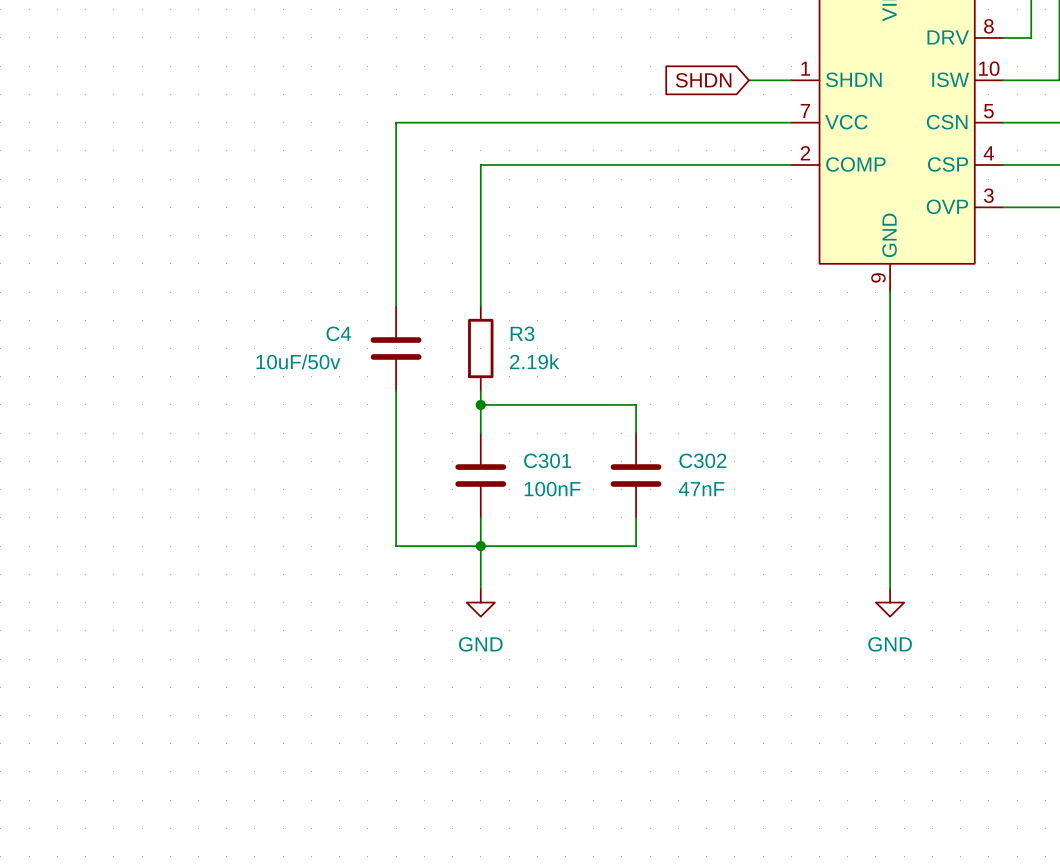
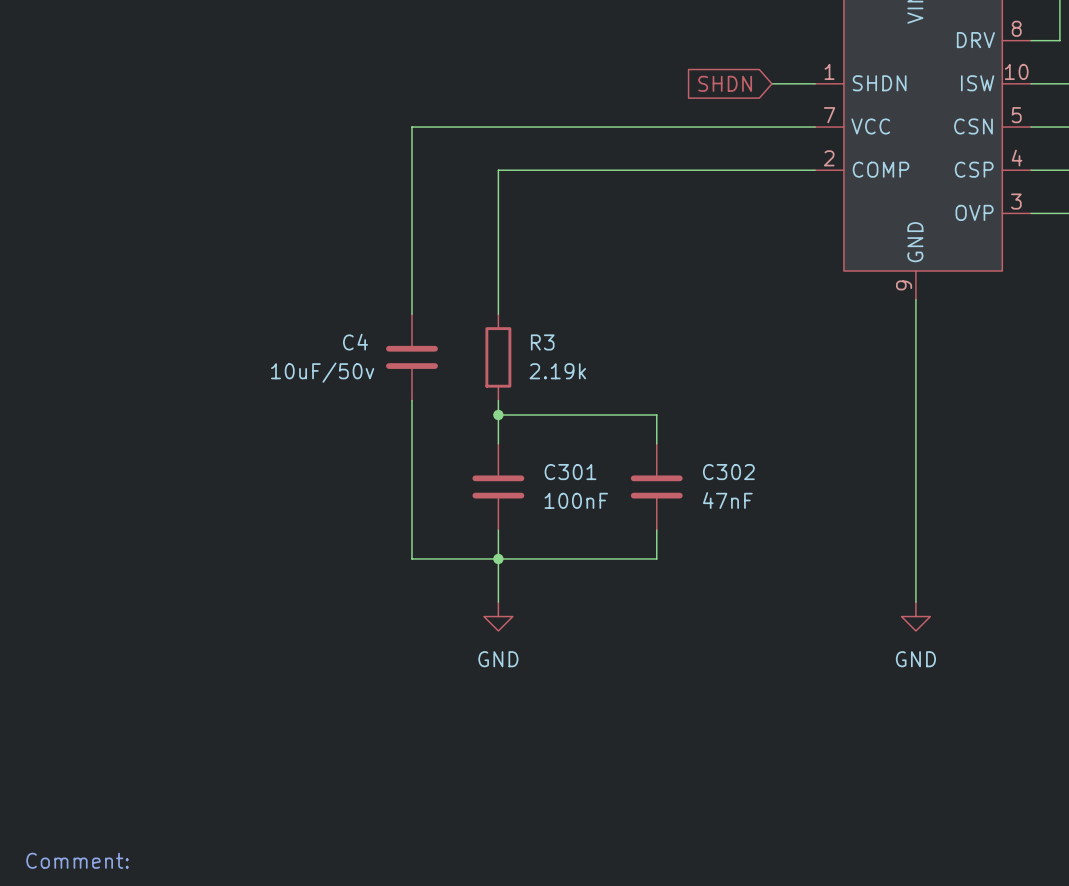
text: none -> Comment: (77, 860)

